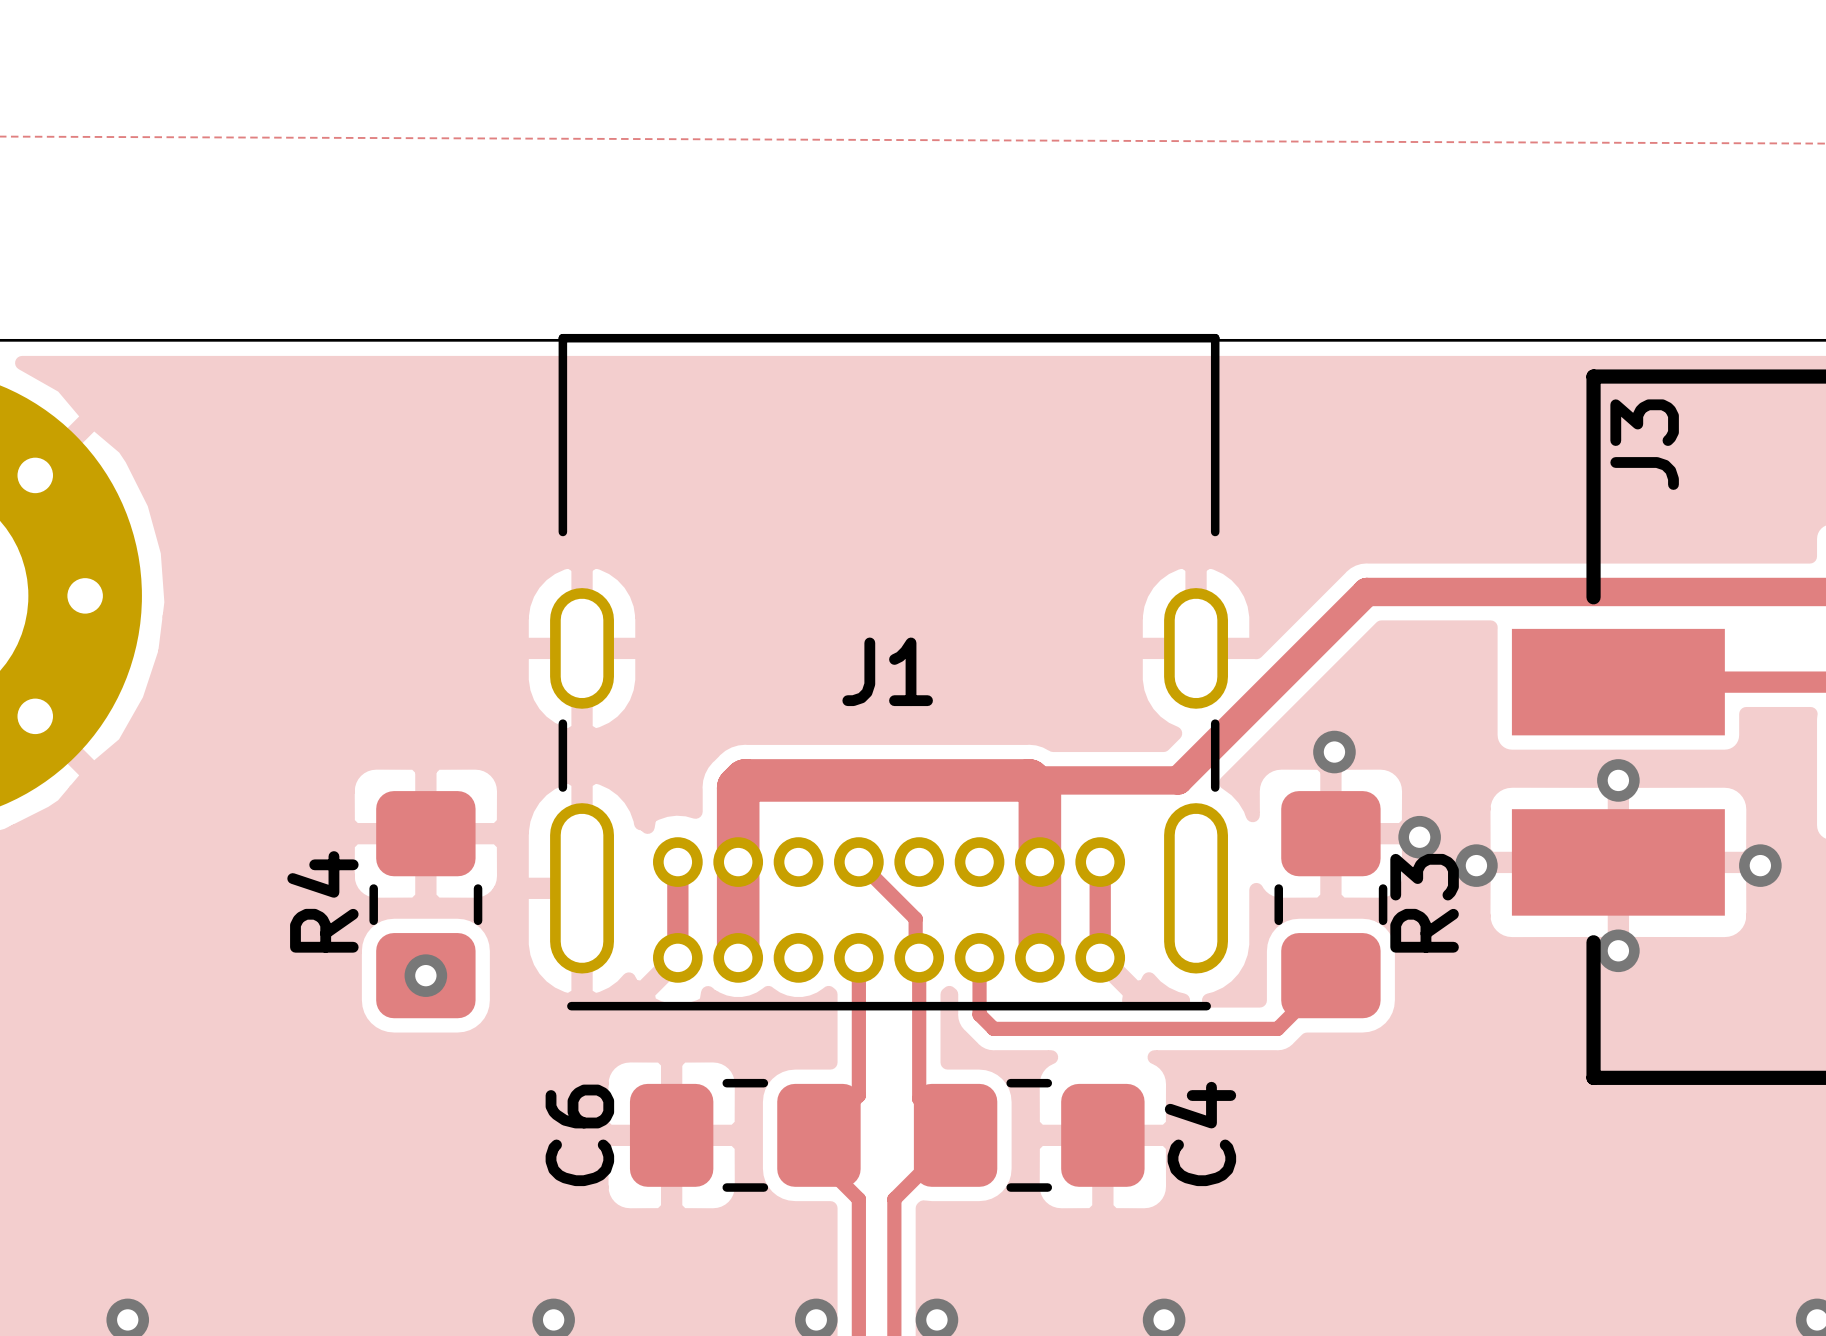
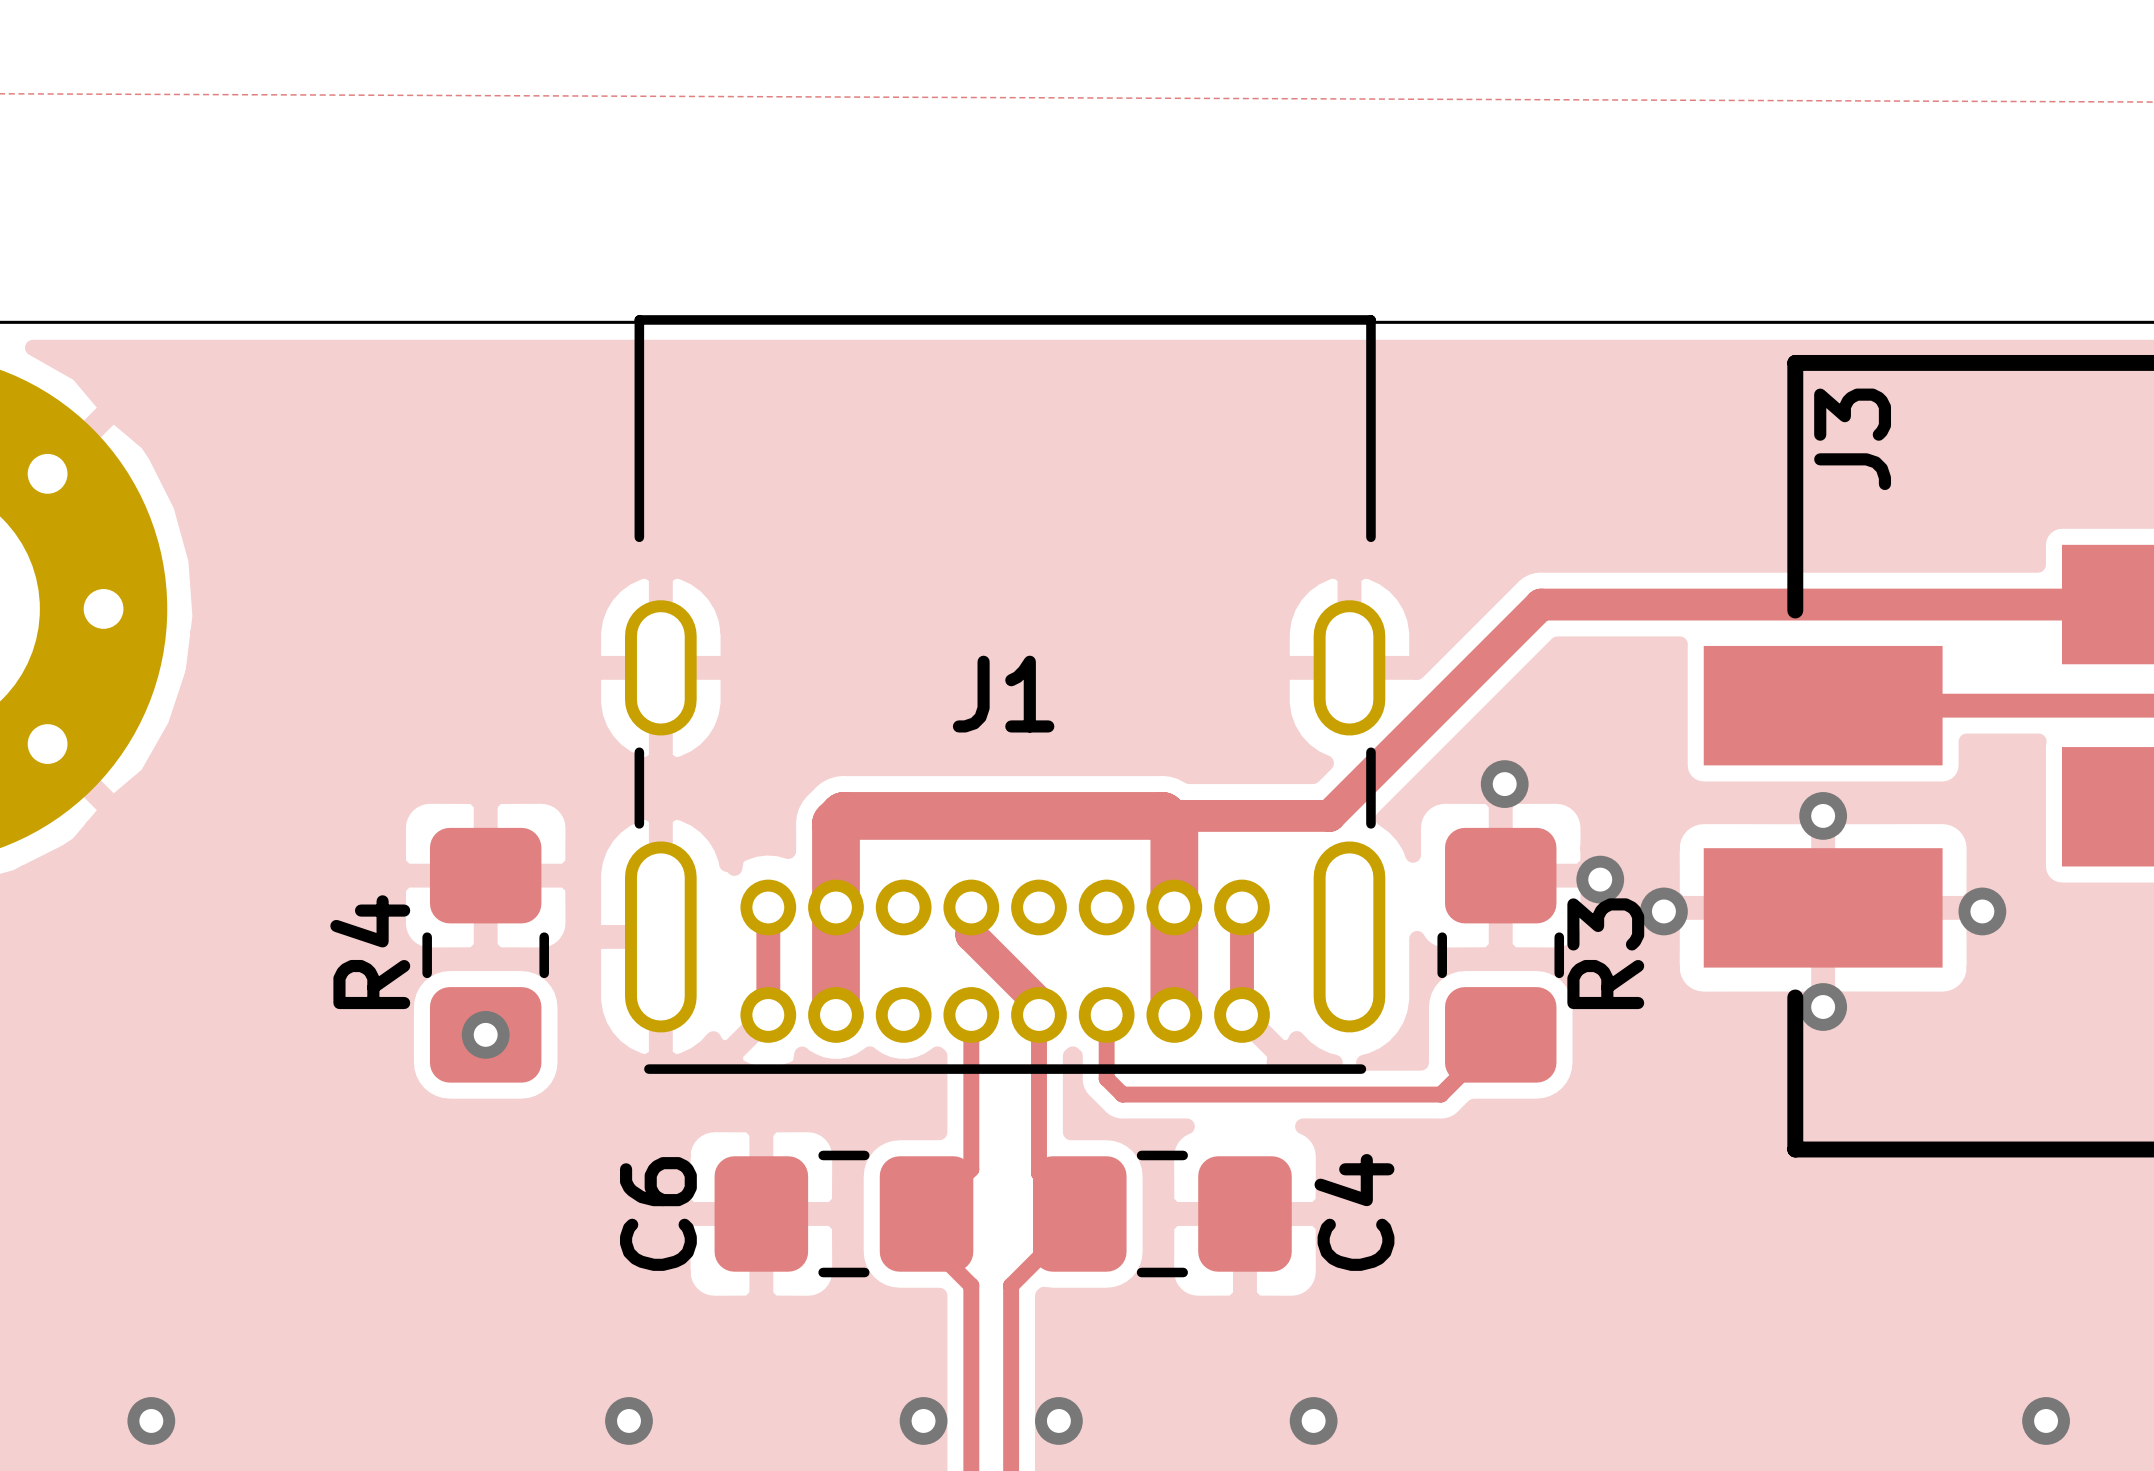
track: (858, 862) (915, 918) (915, 954) (919, 957) -> (971, 907) (971, 935) (1038, 1002)

